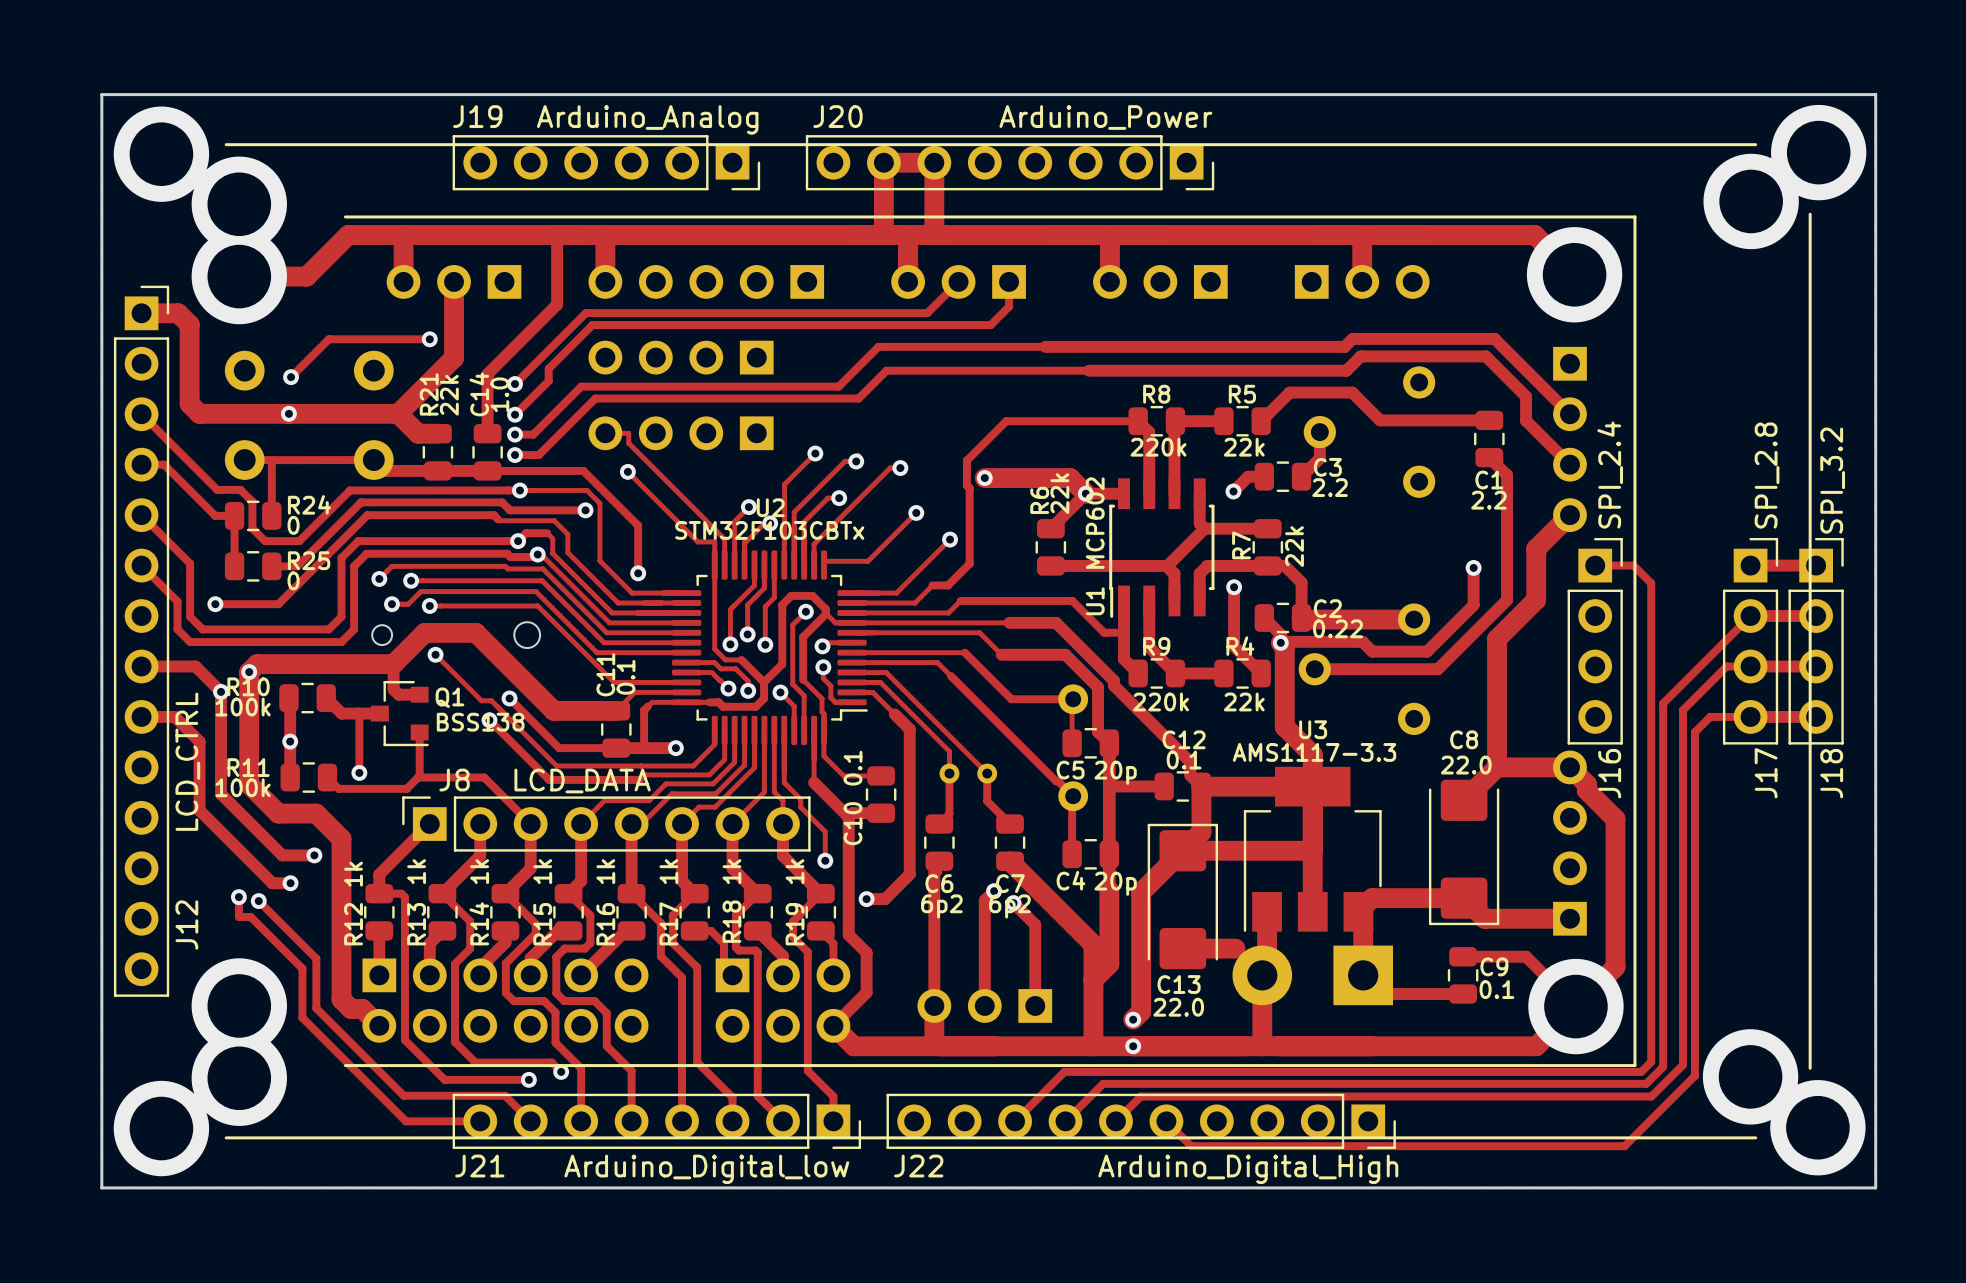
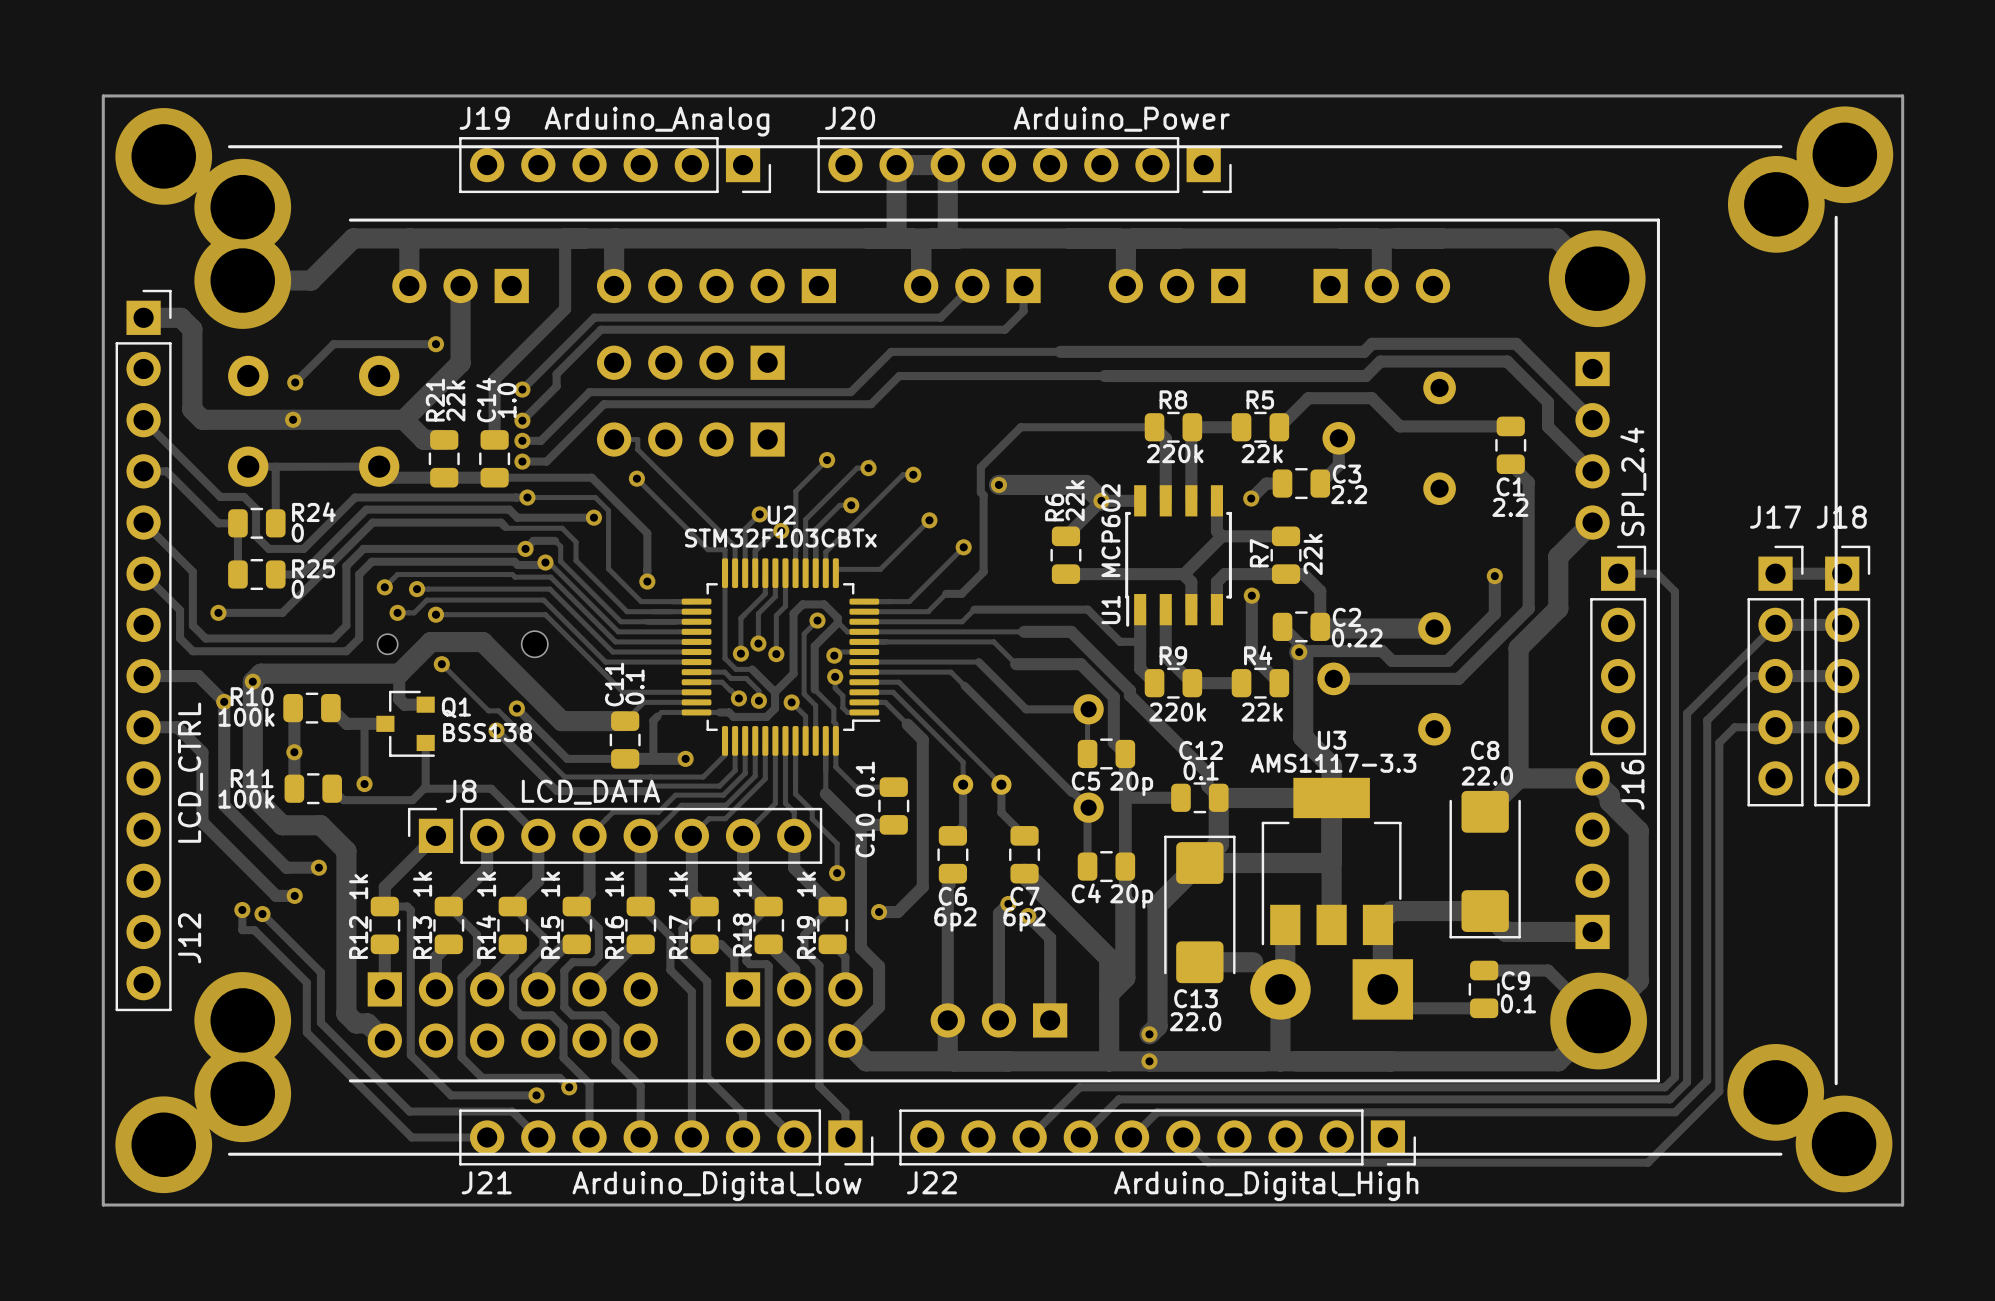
J17 value: SPI_2.8 (1767, 475) -> none
J18 value: SPI_3.2 (1832, 480) -> none
J17 footprint: [1722, 537, 1779, 745] -> [1747, 545, 1804, 807]
J18 footprint: [1788, 537, 1844, 745] -> [1814, 545, 1871, 807]
J17 name position: J17 (1766, 773) -> J17 (1775, 517)
J18 name position: J18 (1831, 773) -> J18 (1841, 517)

